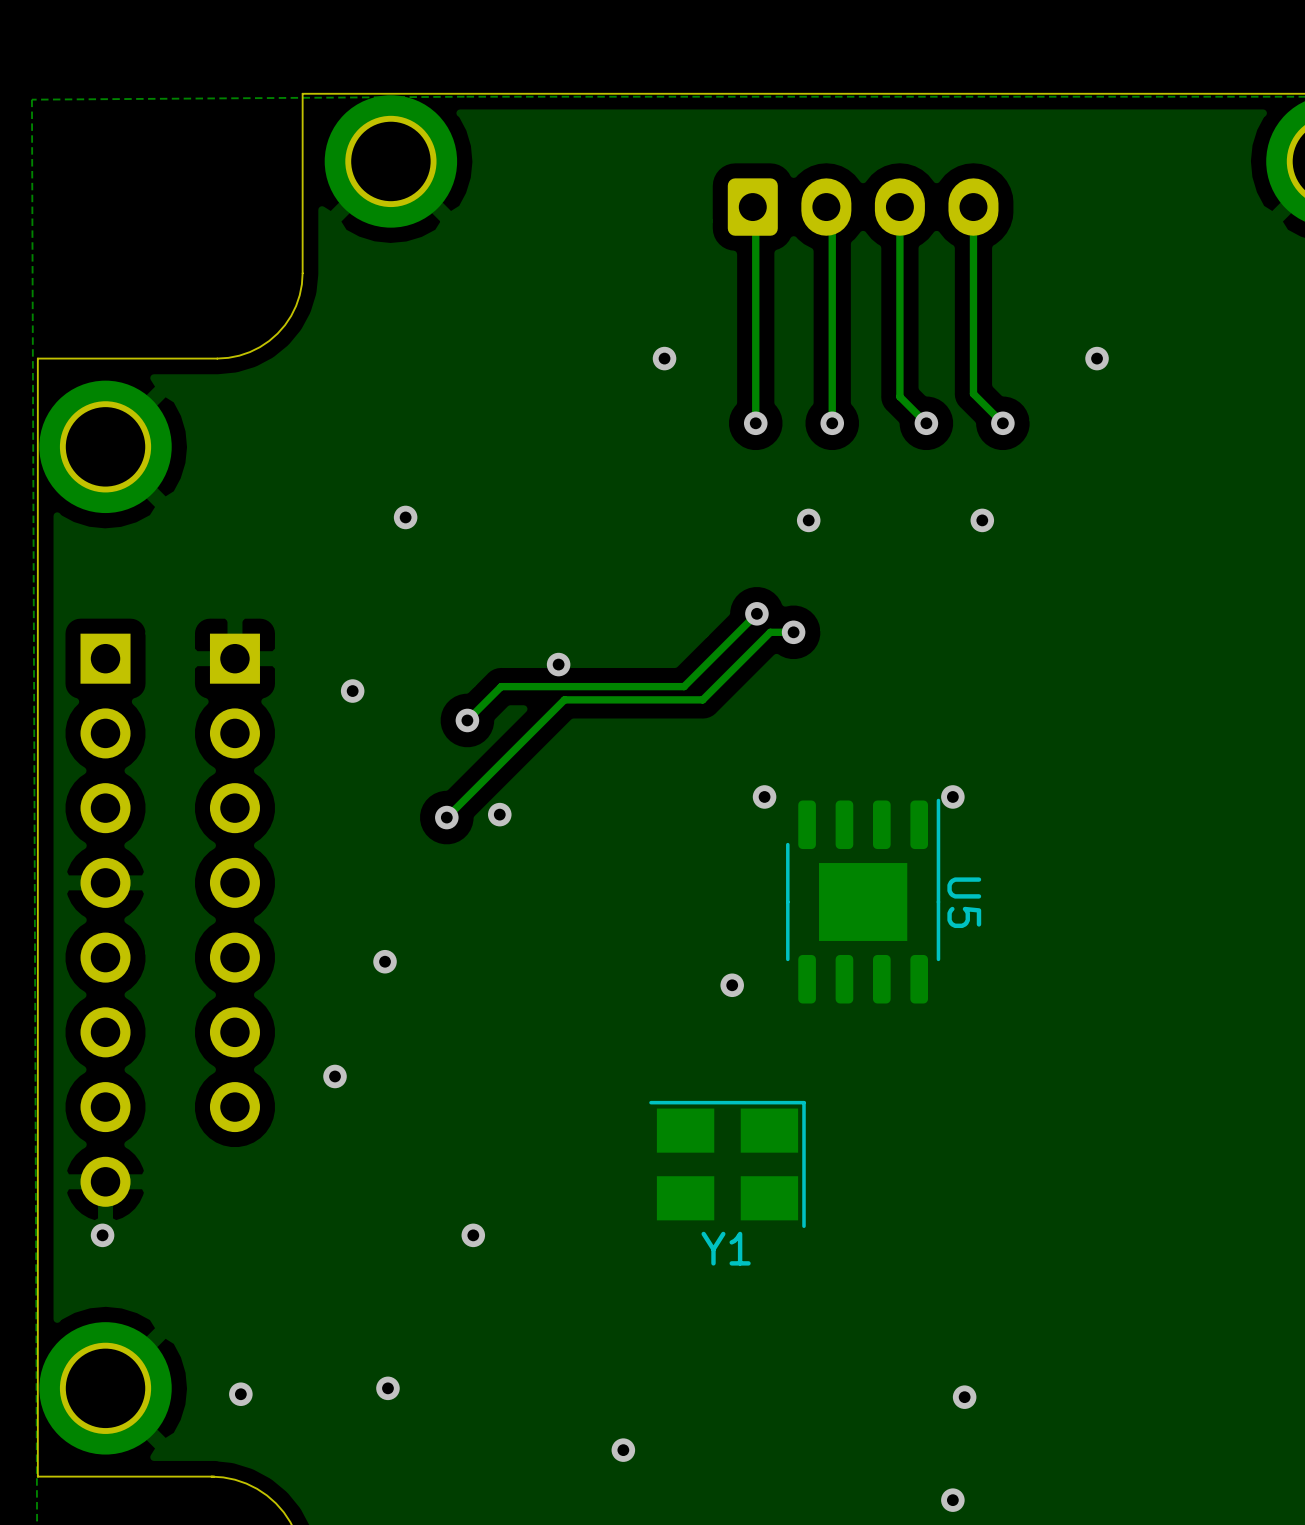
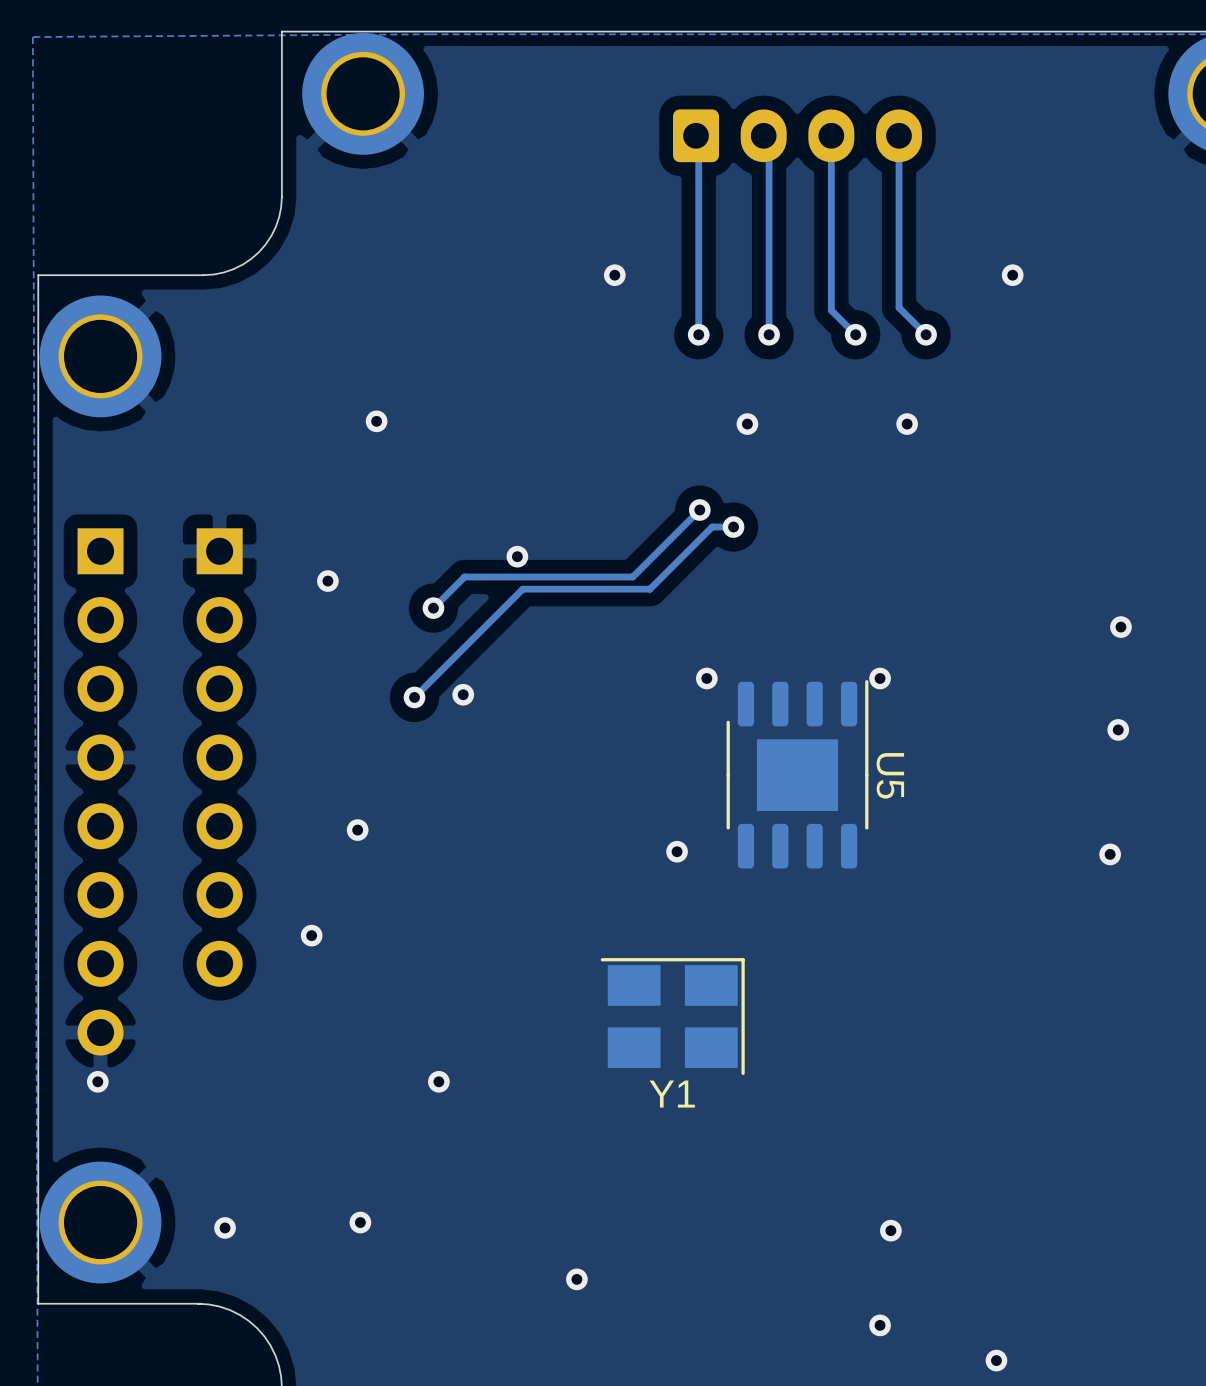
via: none -> (1120, 627)
via: none -> (1118, 729)
via: none -> (1110, 854)

